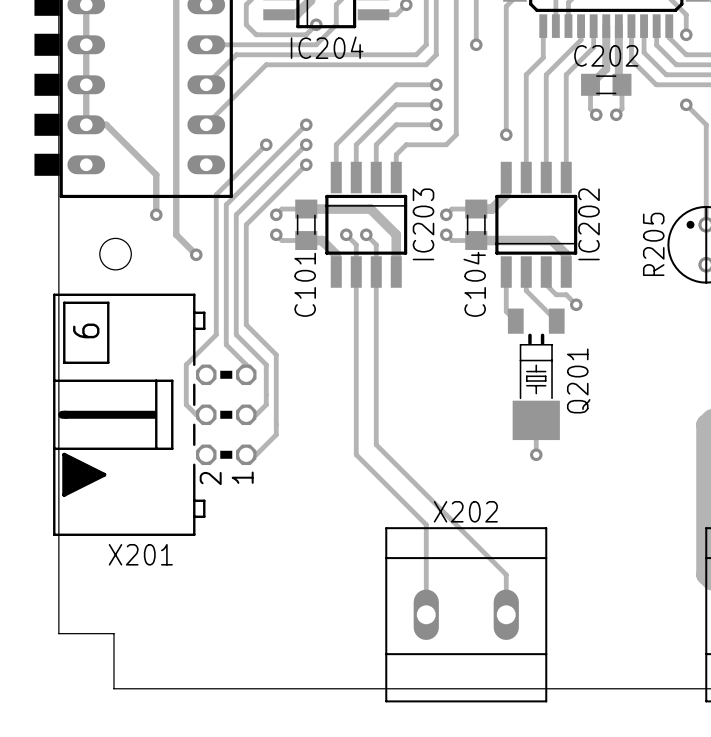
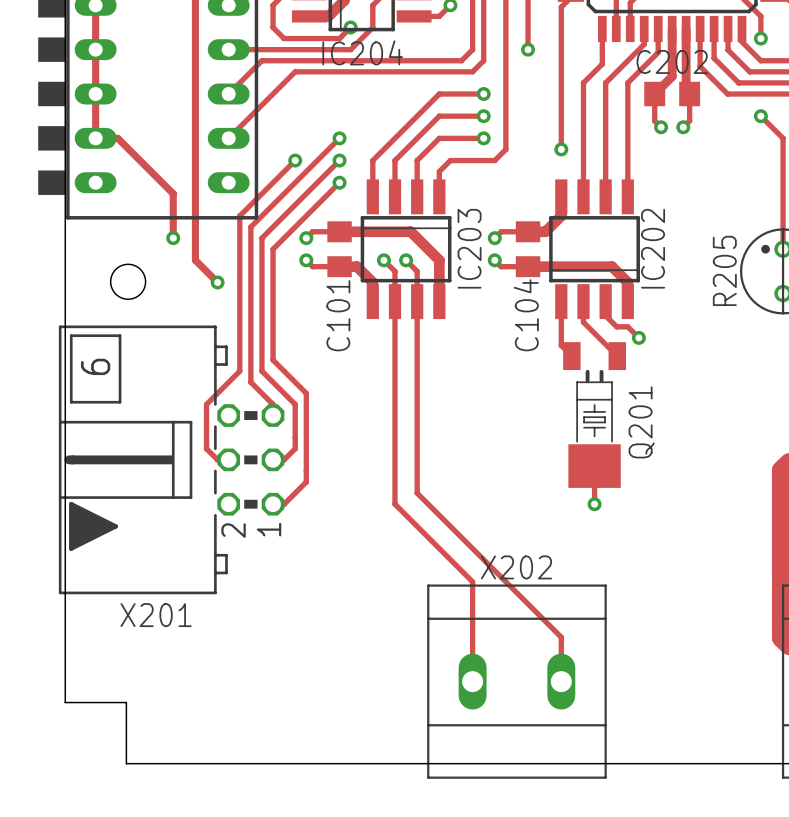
C202 footprint: [581, 73, 632, 96] -> [644, 81, 701, 107]
C101 footprint: [295, 199, 318, 250] -> [327, 221, 352, 278]
C104 footprint: [465, 199, 488, 250] -> [515, 221, 541, 278]

